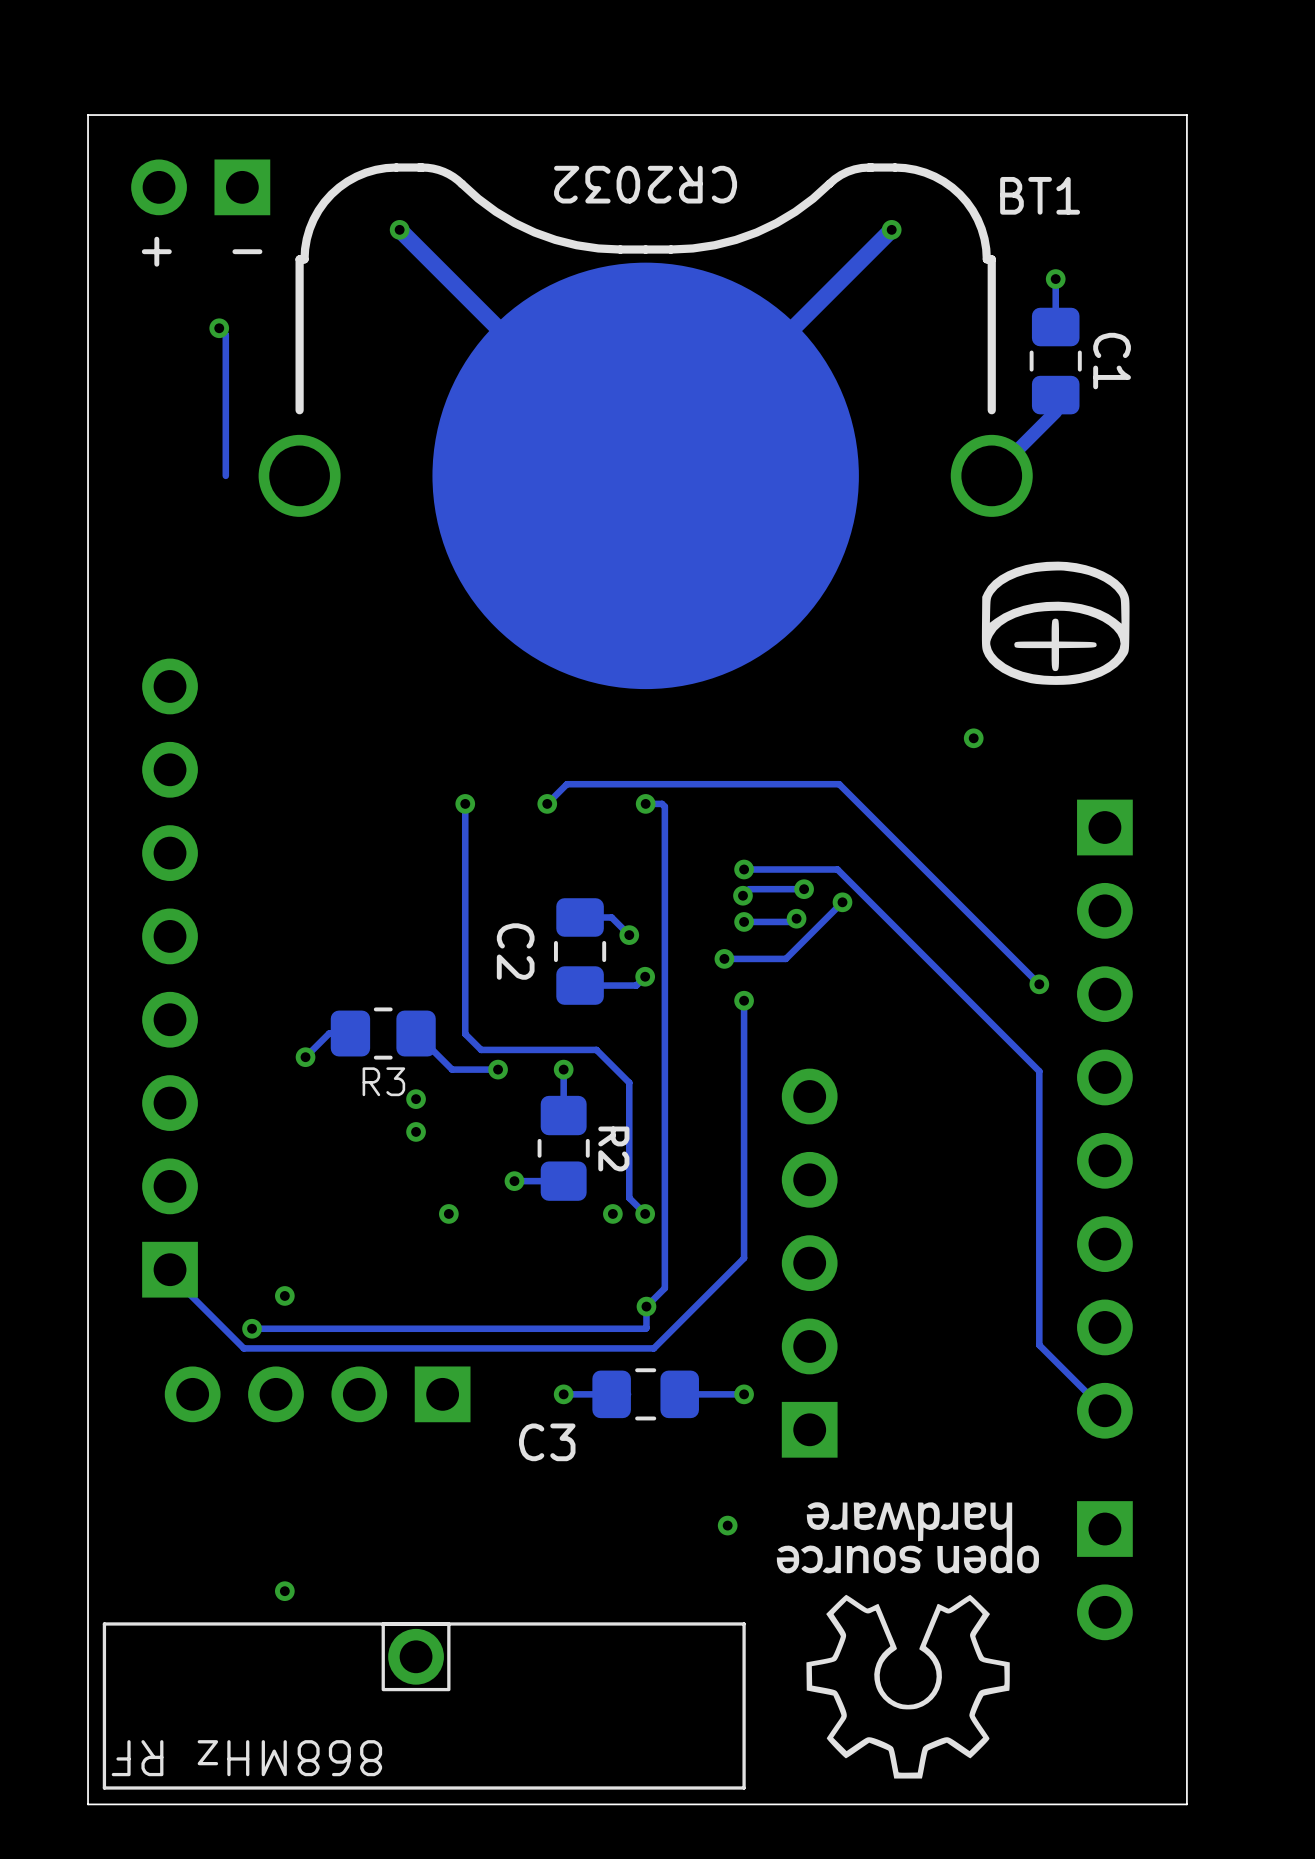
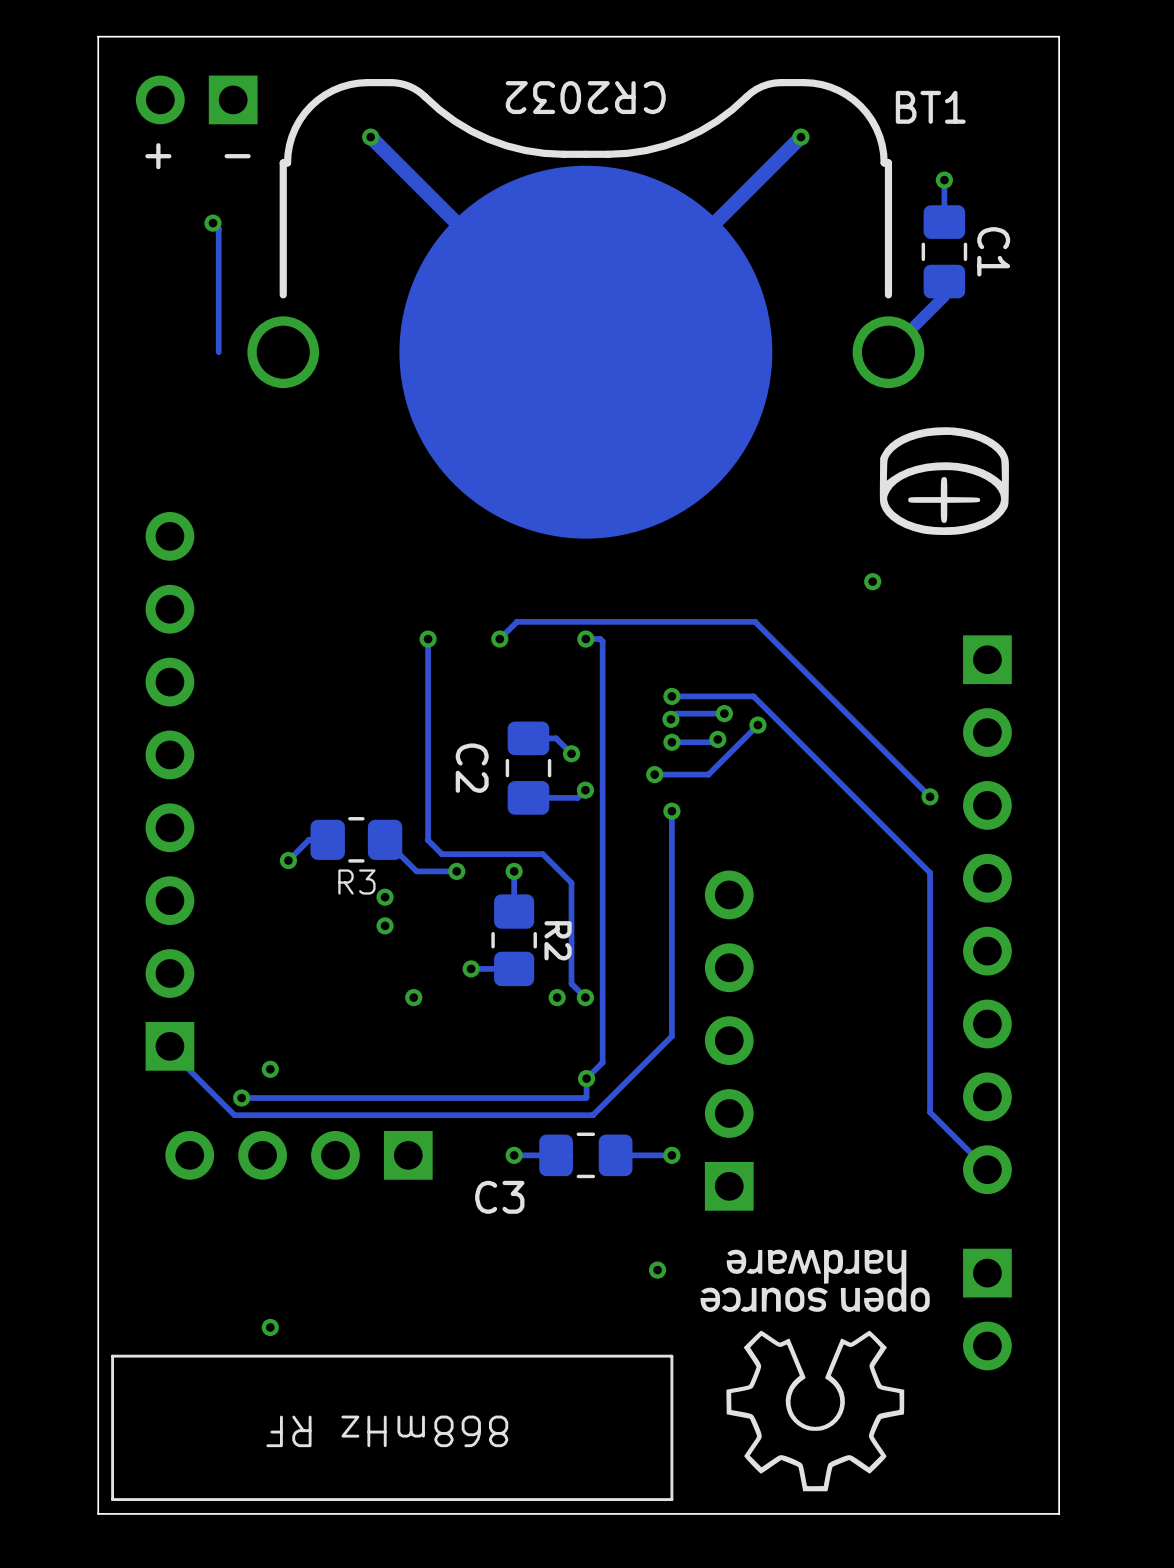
part: (416, 1656) -> none
text: 868MHz RF (246, 1758) -> 868mHz RF (387, 1431)

